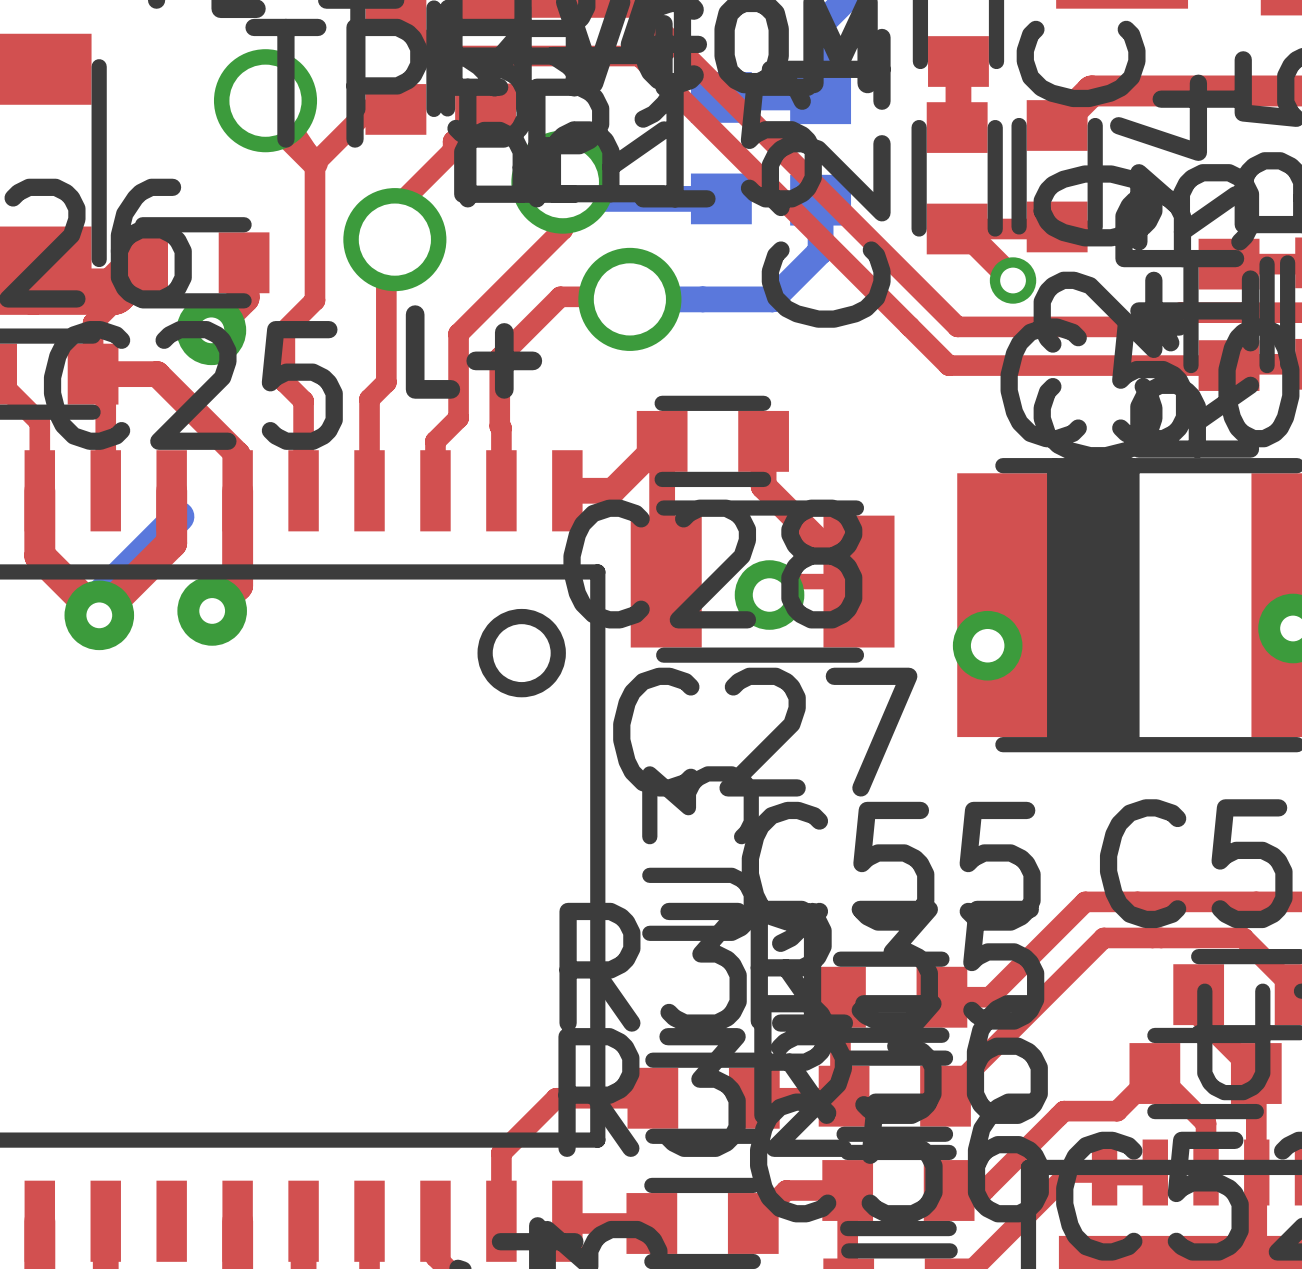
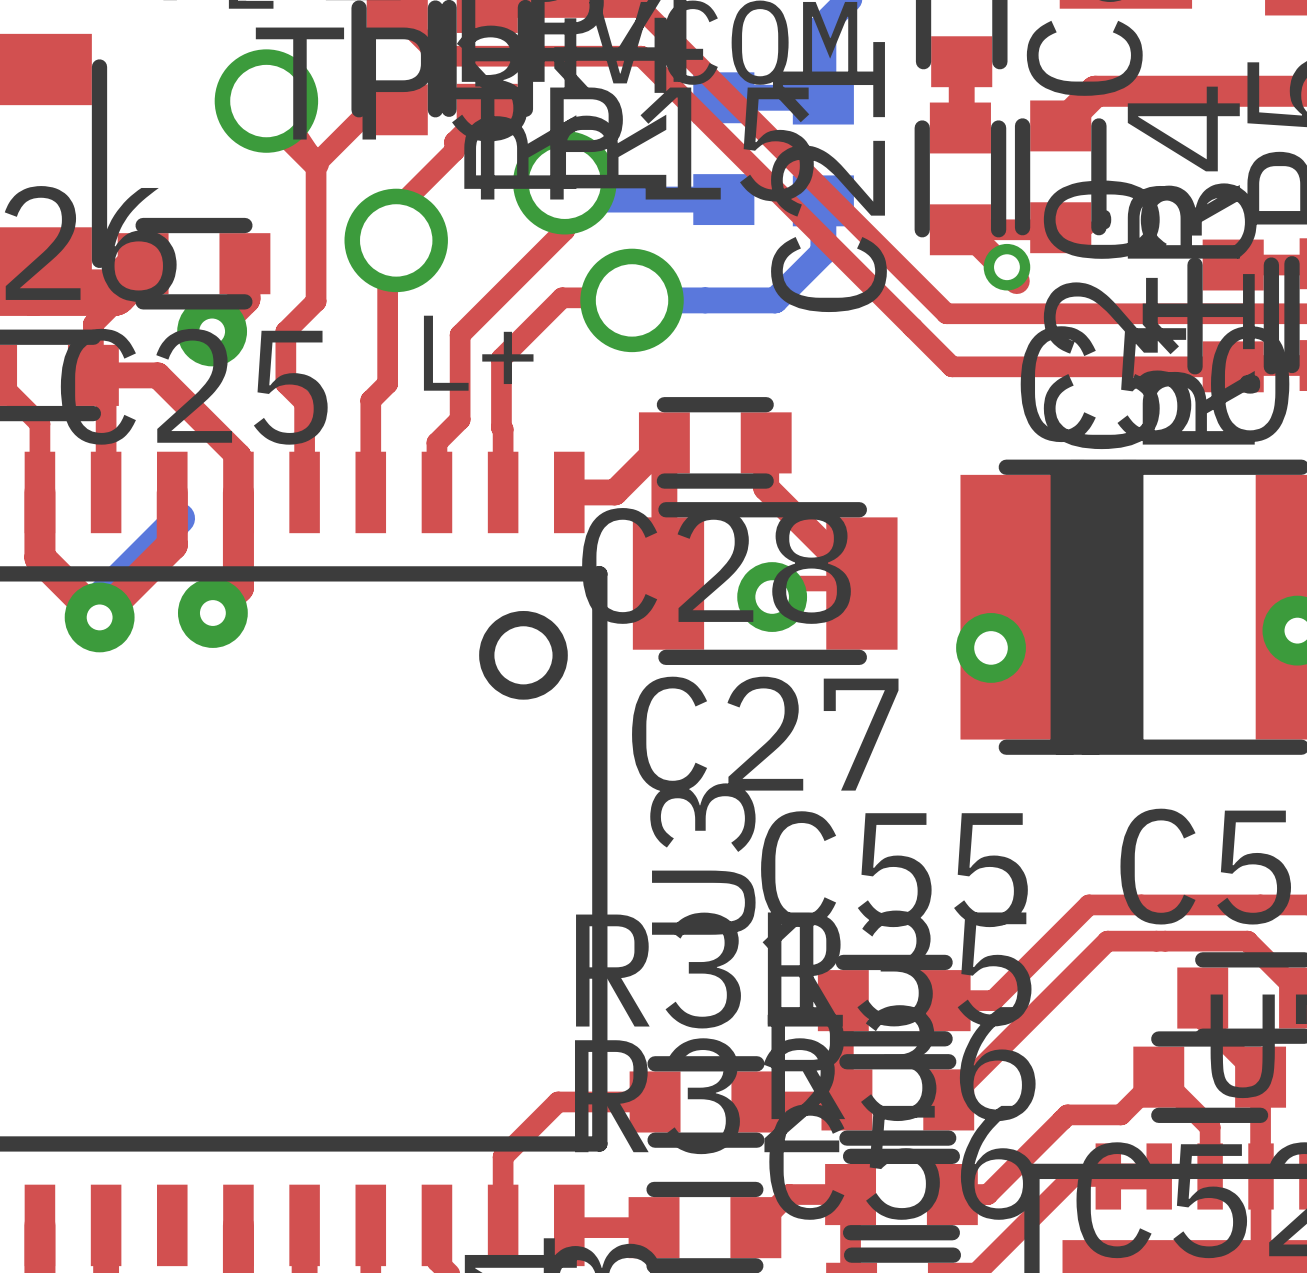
via position: (1013, 280) -> (1006, 267)
top track: (943, 312) (957, 326) (1166, 326) (1180, 312) -> (946, 313) (1184, 313)

